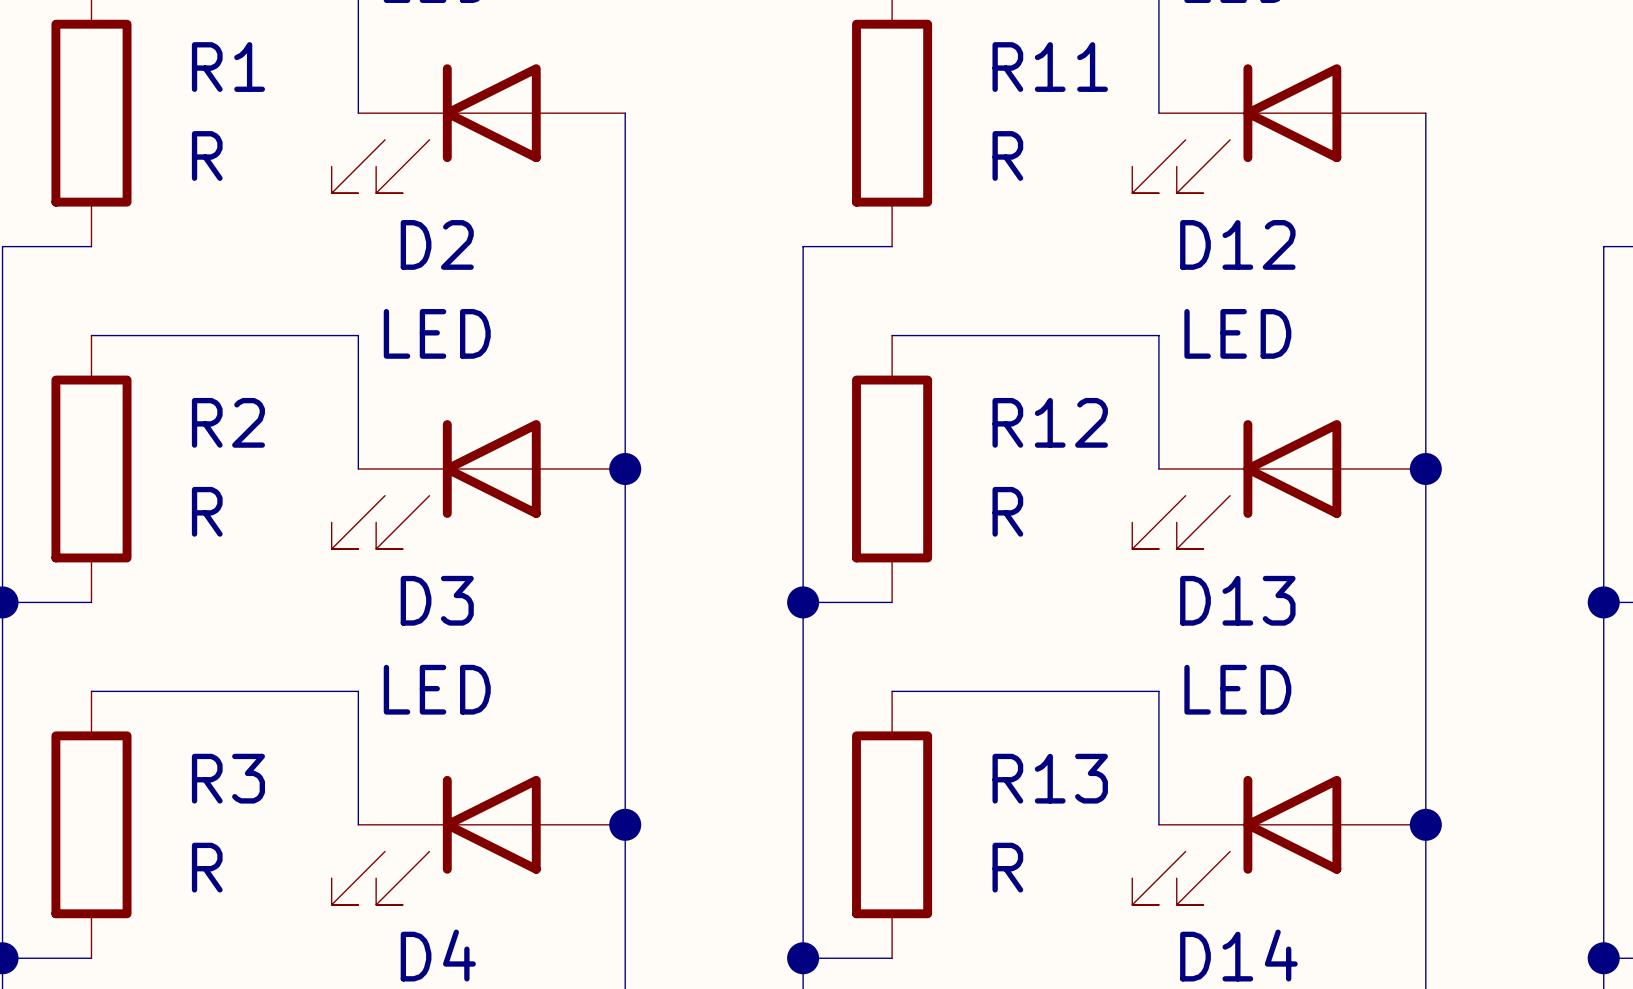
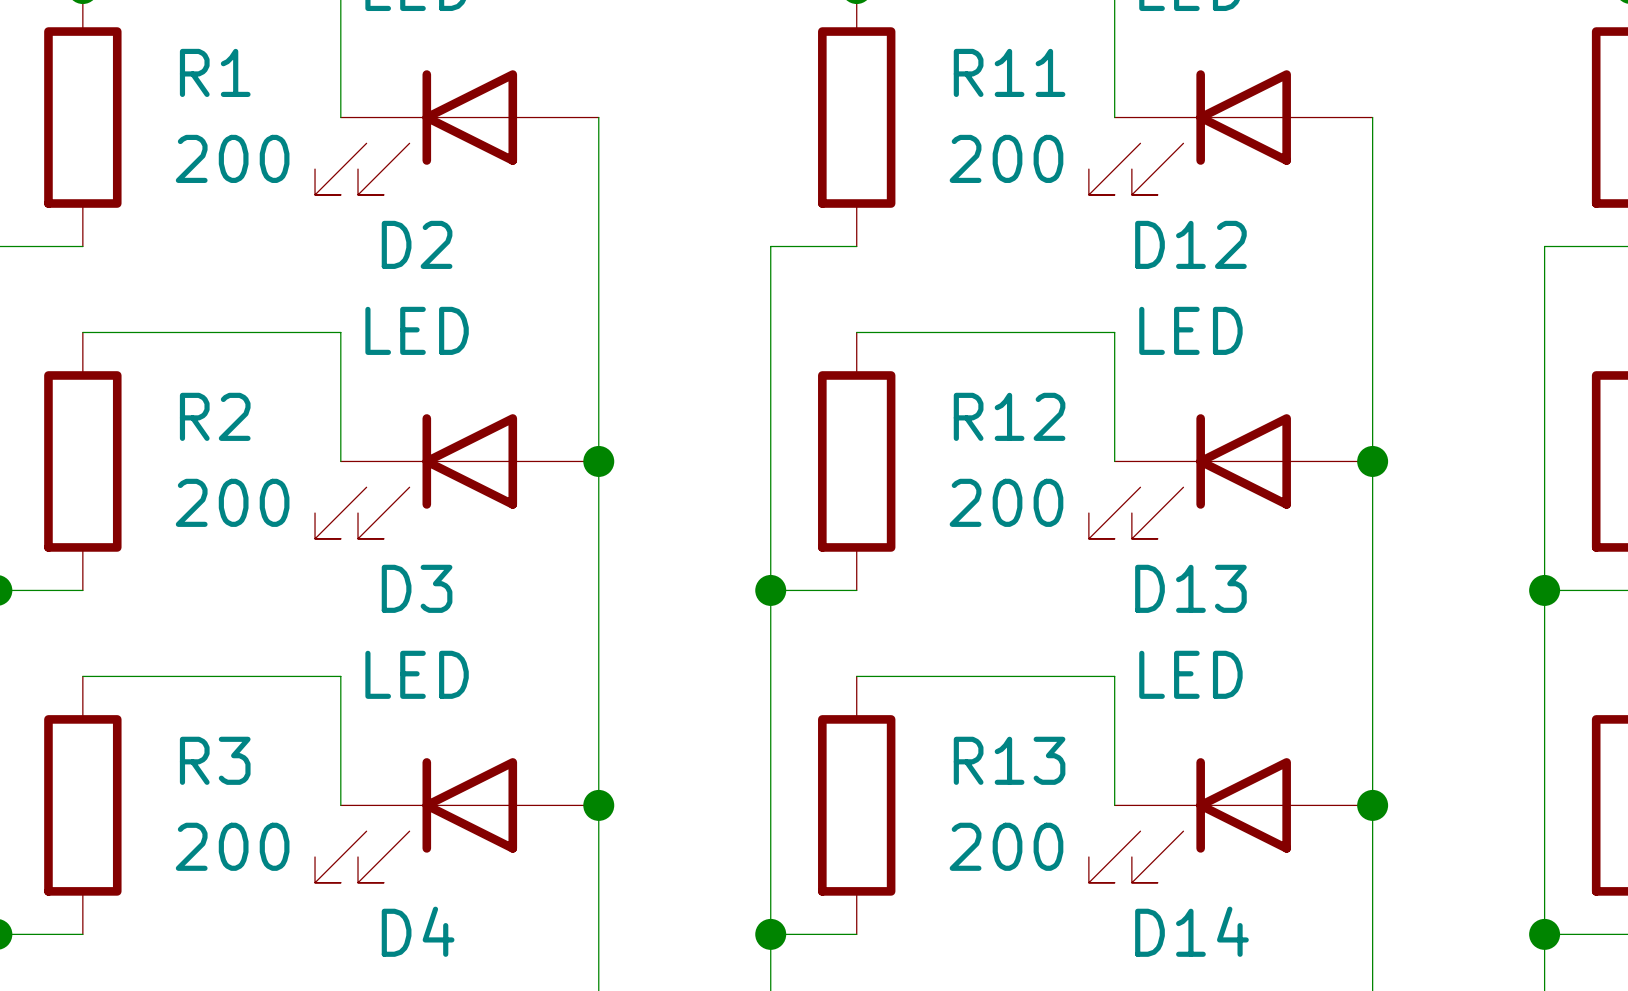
R1 value: R (207, 155) -> 200 (232, 158)
R11 value: R (1007, 155) -> 200 (1006, 158)
R2 value: R (207, 511) -> 200 (232, 502)
R12 value: R (1007, 511) -> 200 (1006, 502)
R3 value: R (207, 867) -> 200 (232, 846)
R13 value: R (1007, 867) -> 200 (1006, 846)

